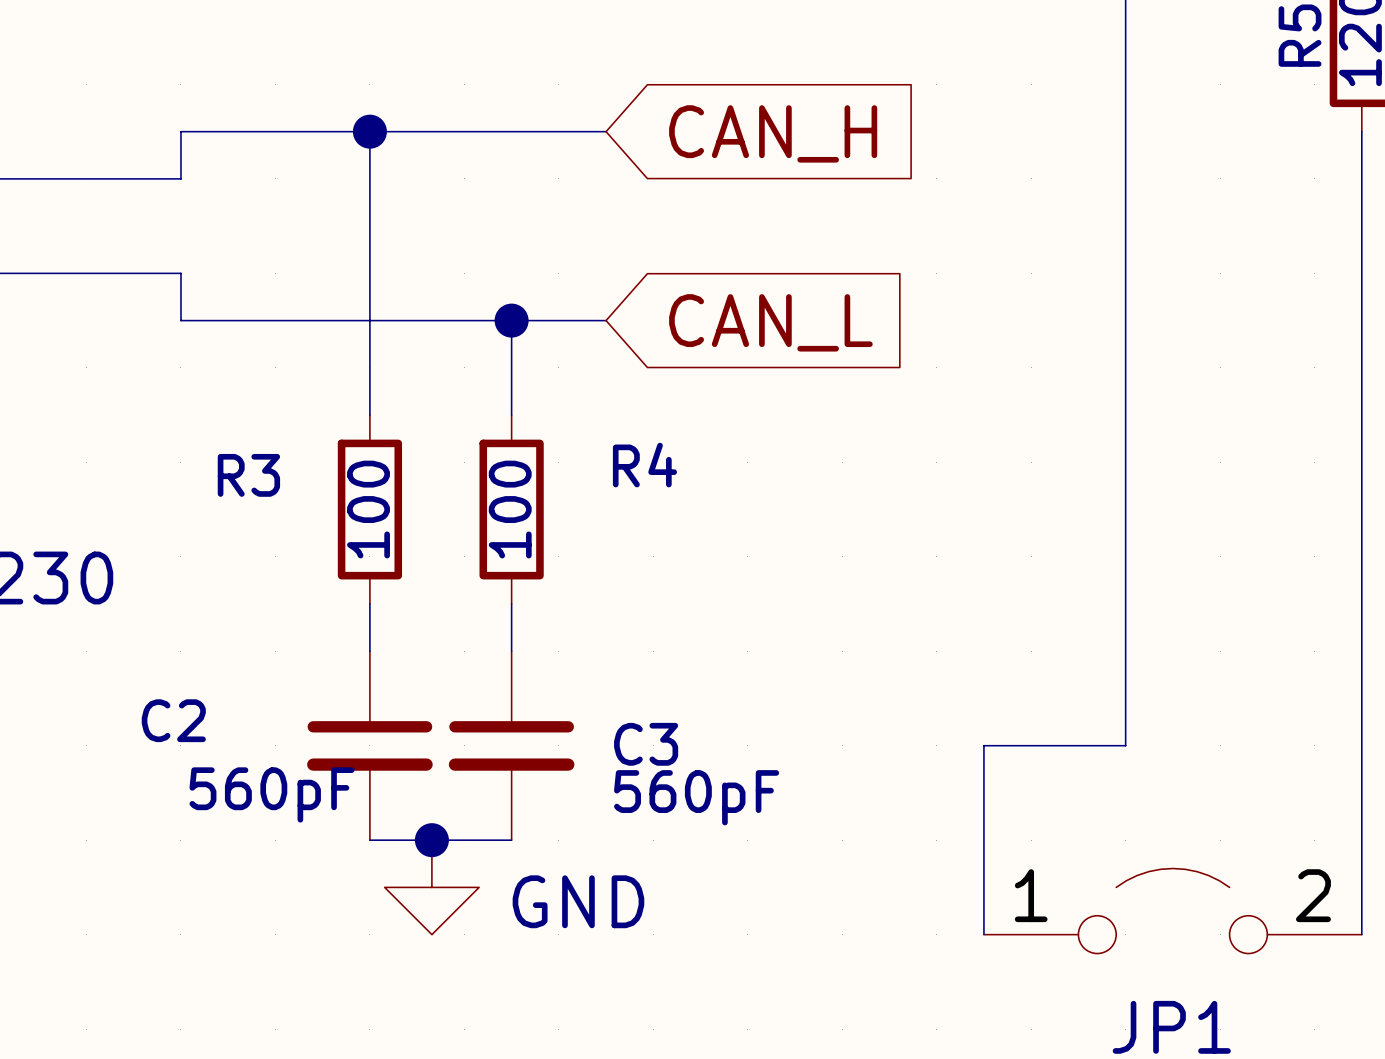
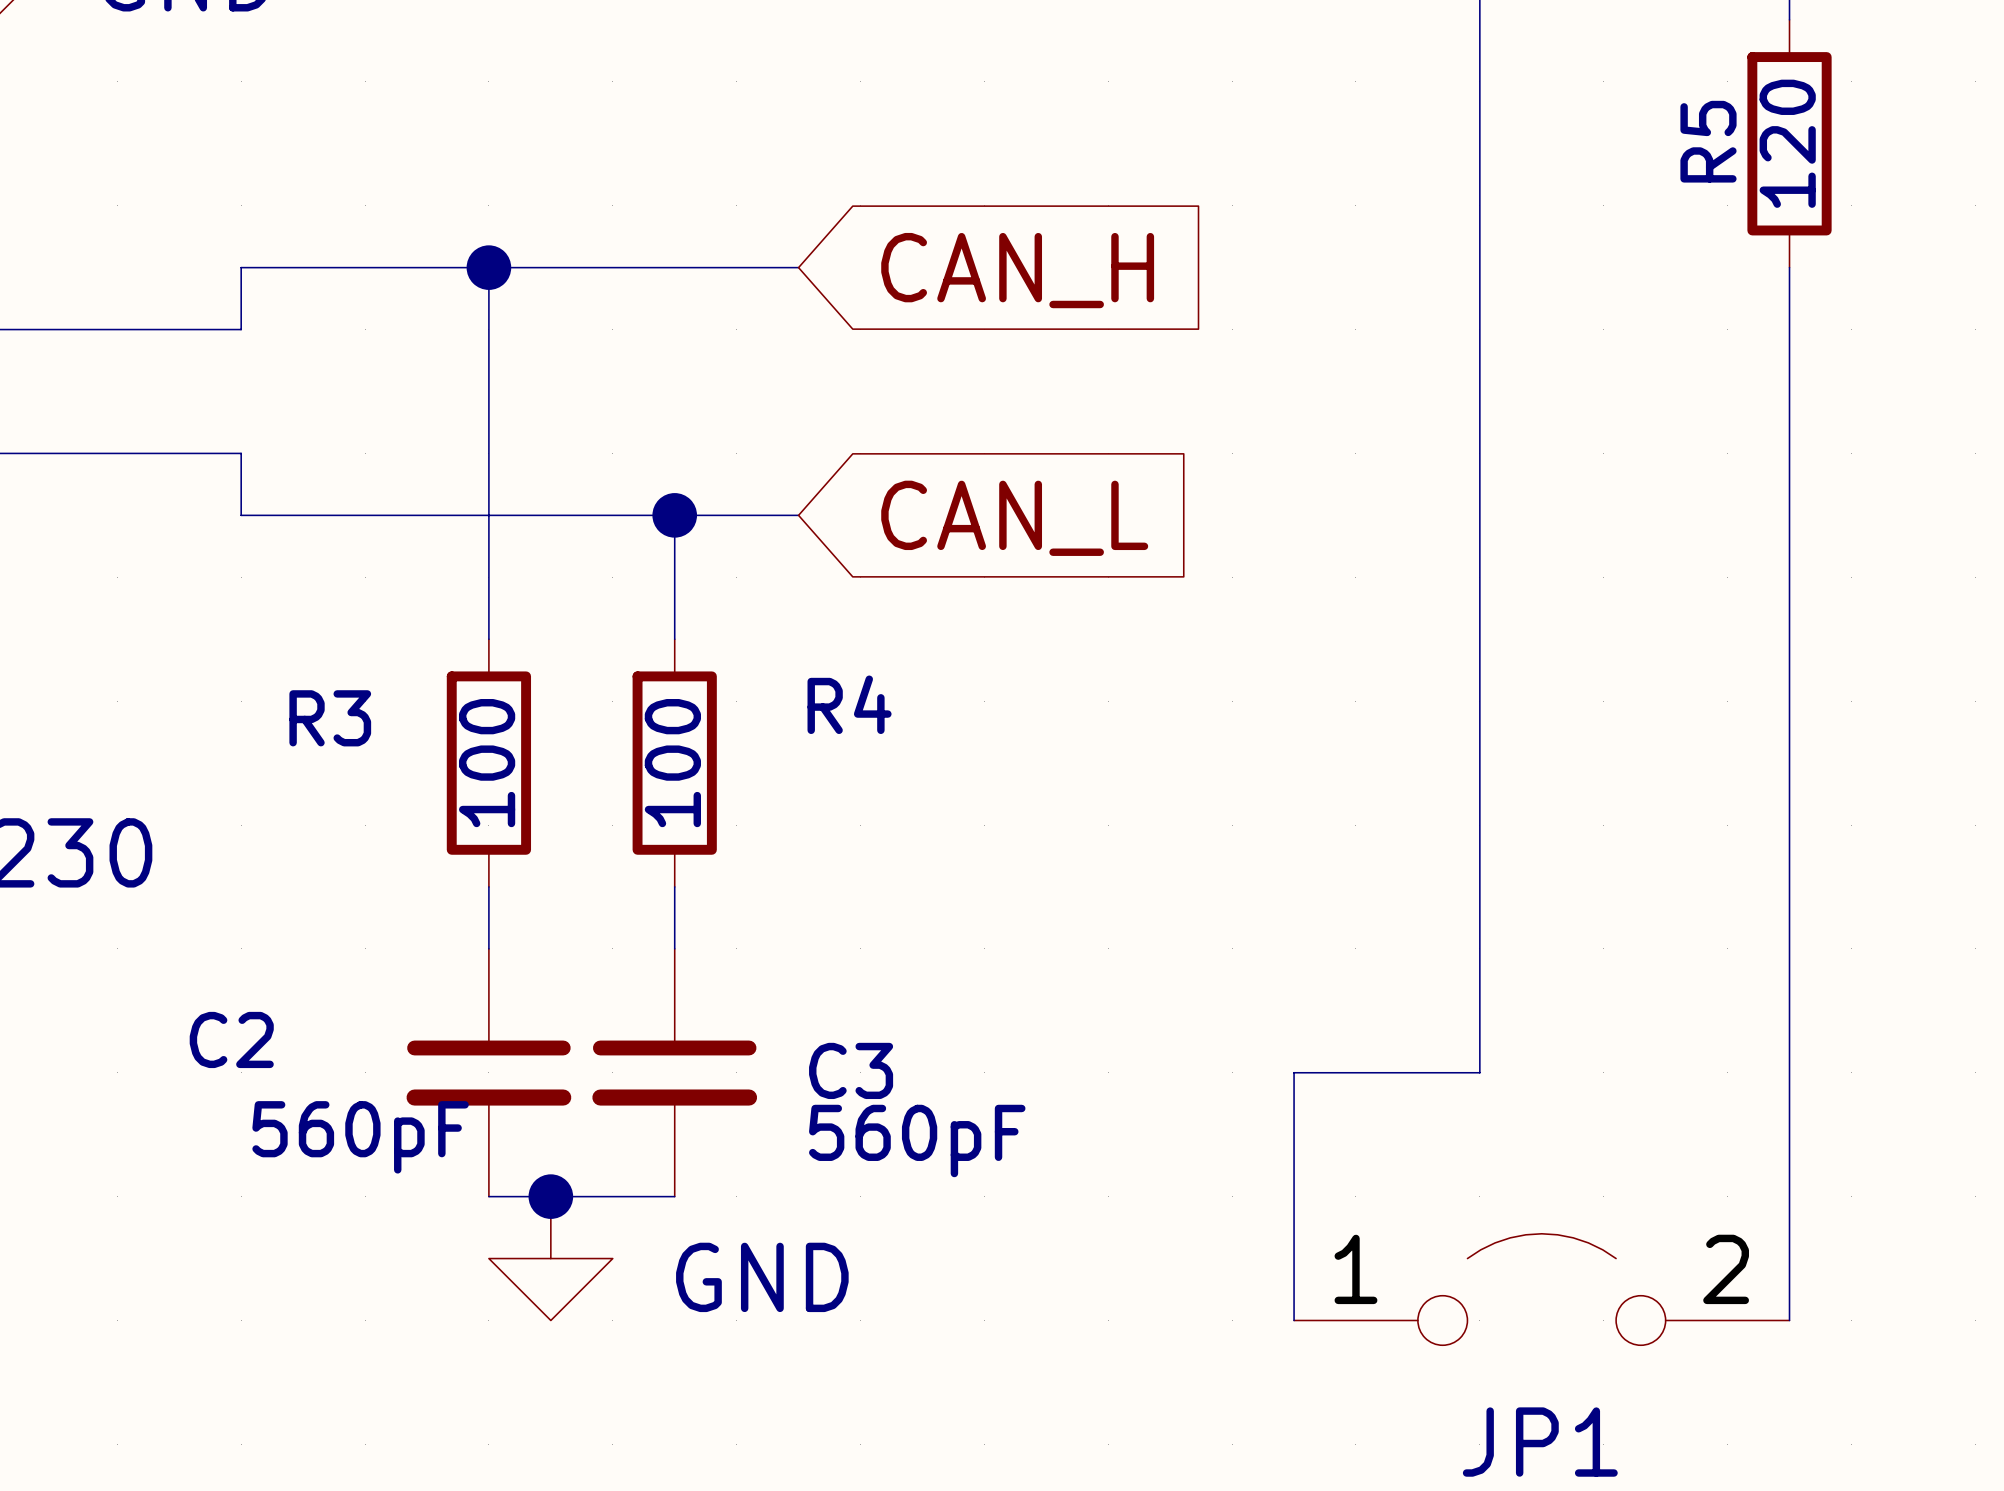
junction position: (431, 840) -> (550, 1196)
power symbol position: GND (431, 887) -> GND (550, 1258)

